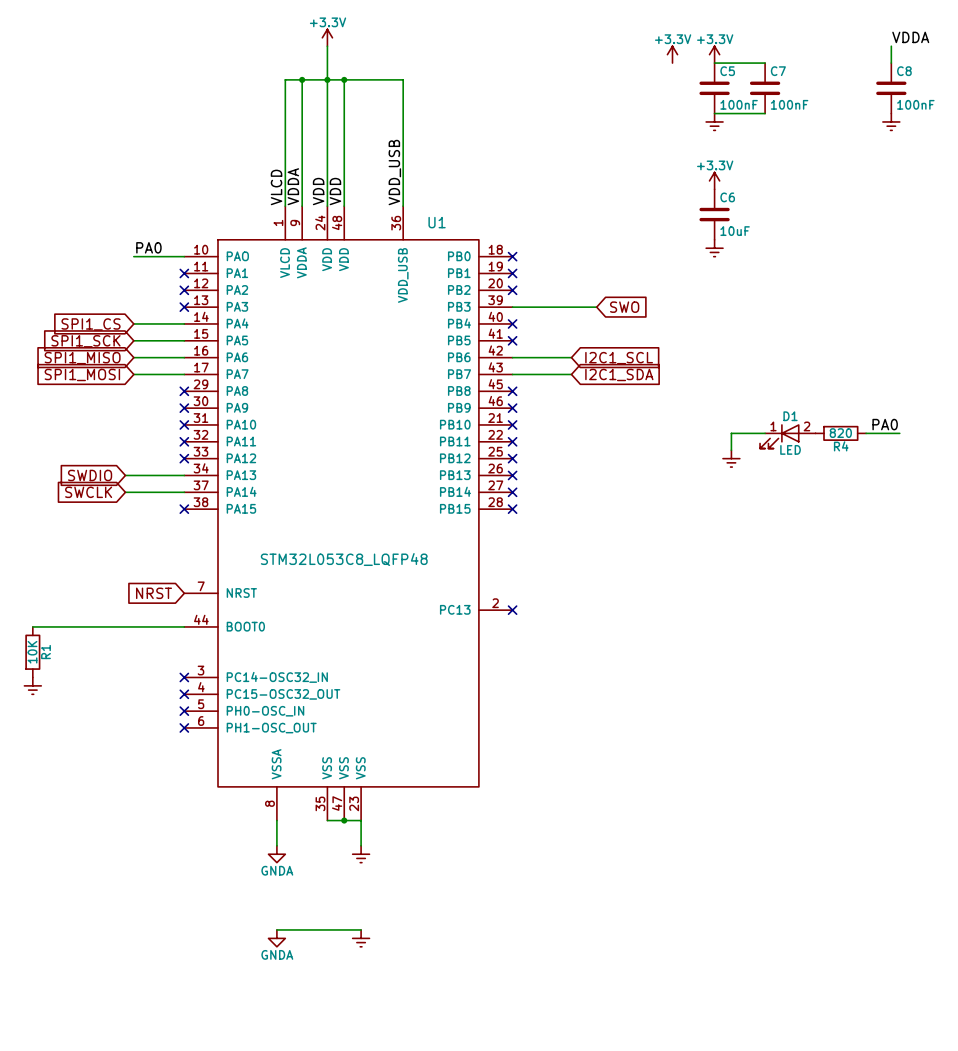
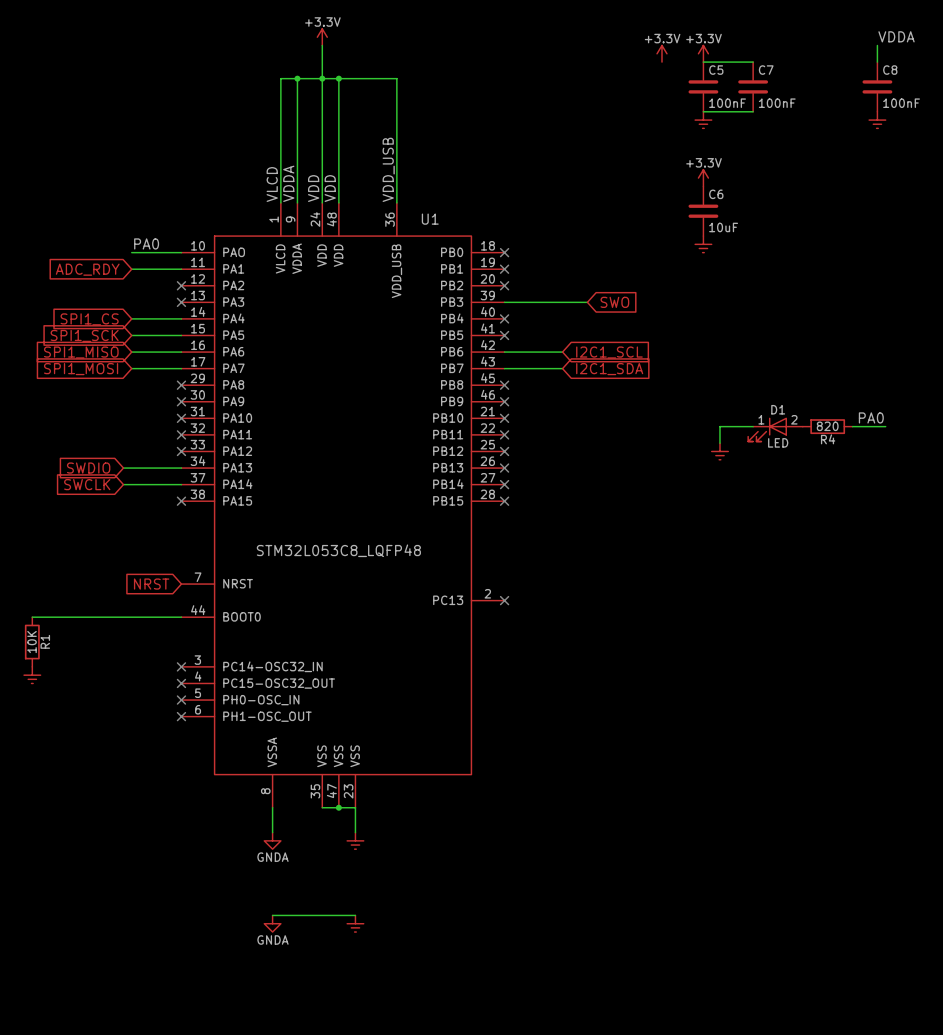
global label: none -> ADC_RDY (87, 269)
wire: none -> (131, 269) (181, 269)
no-connect mark: (184, 273) -> none

